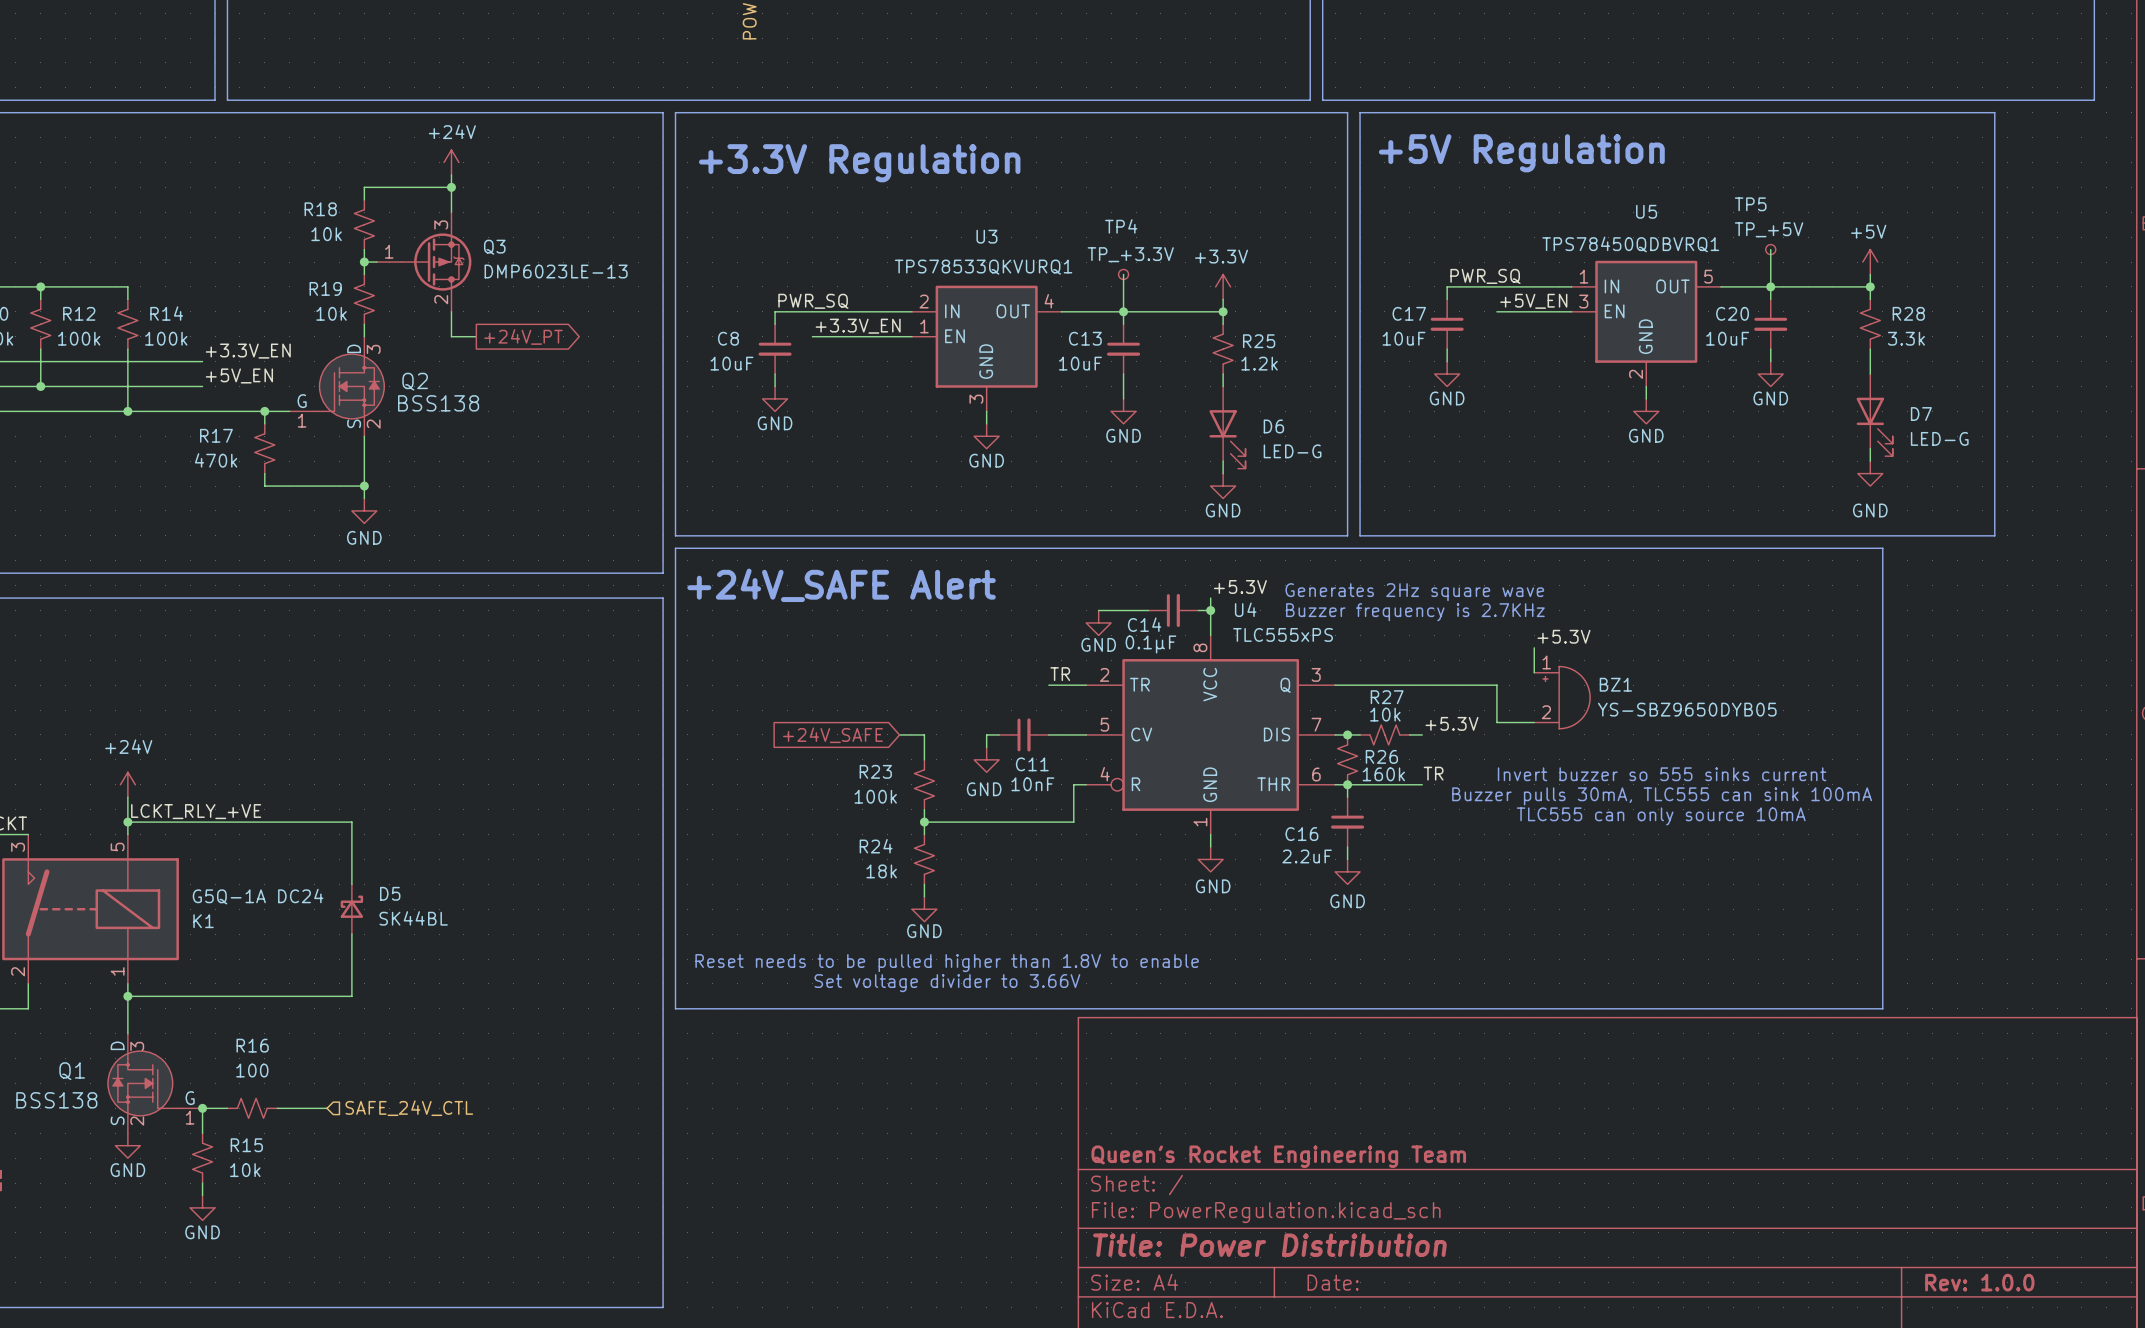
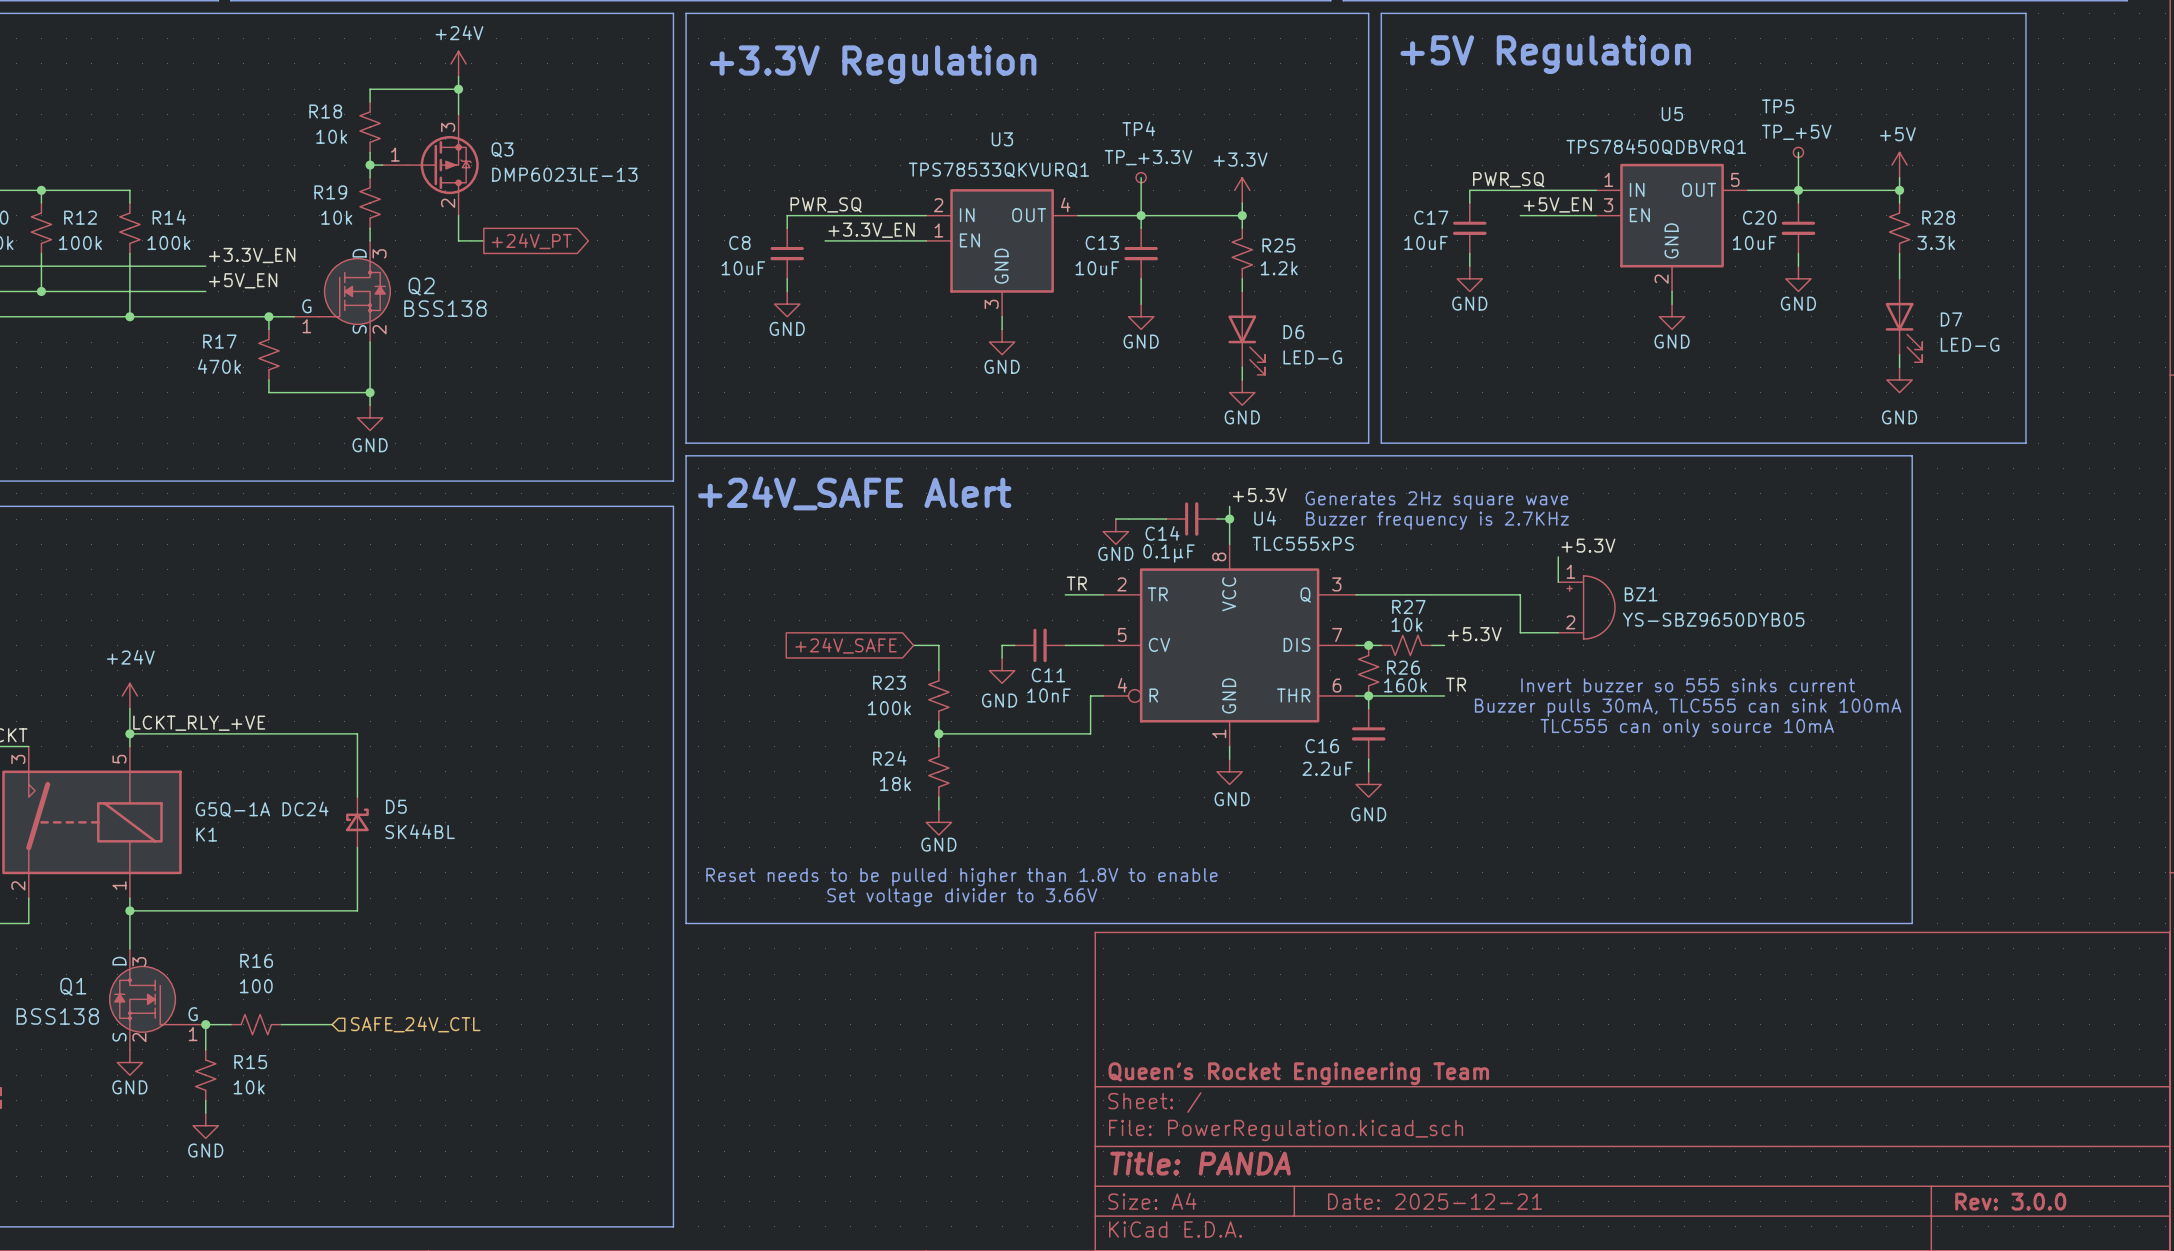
title block: Title: Power Distribution (1269, 1245) -> Title: PANDA (1200, 1163)
title block: Date: (1333, 1282) -> Date: 2025-12-21 (1435, 1201)
title block: Rev: 1.0.0 (1979, 1282) -> Rev: 3.0.0 (2010, 1201)

